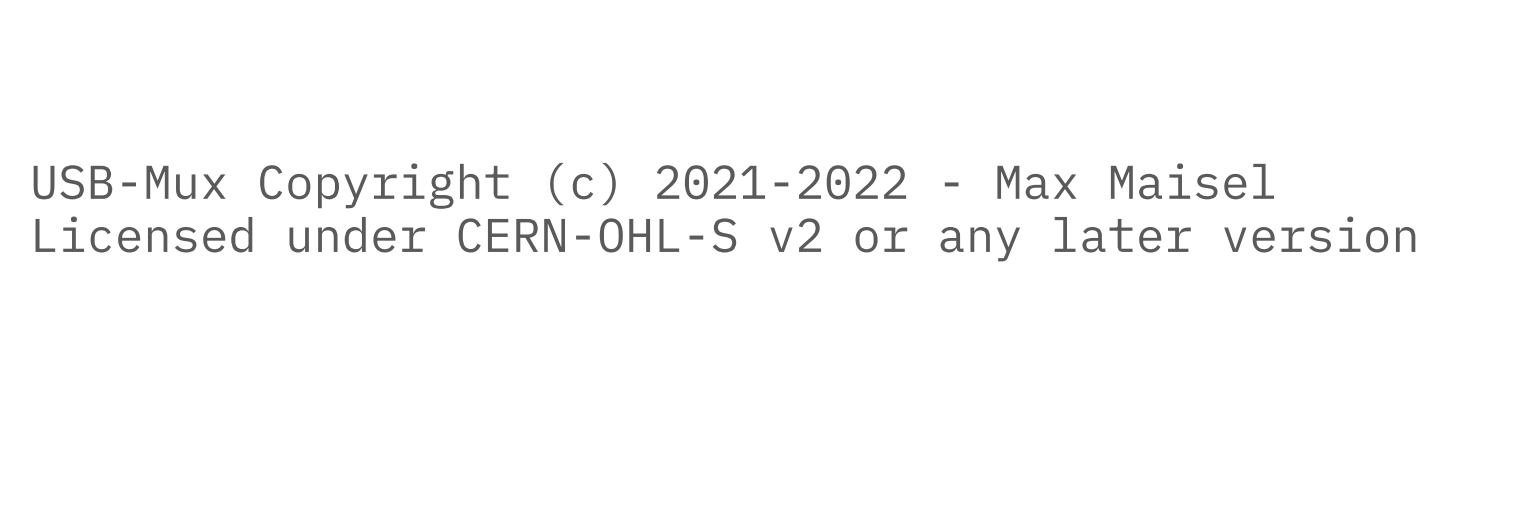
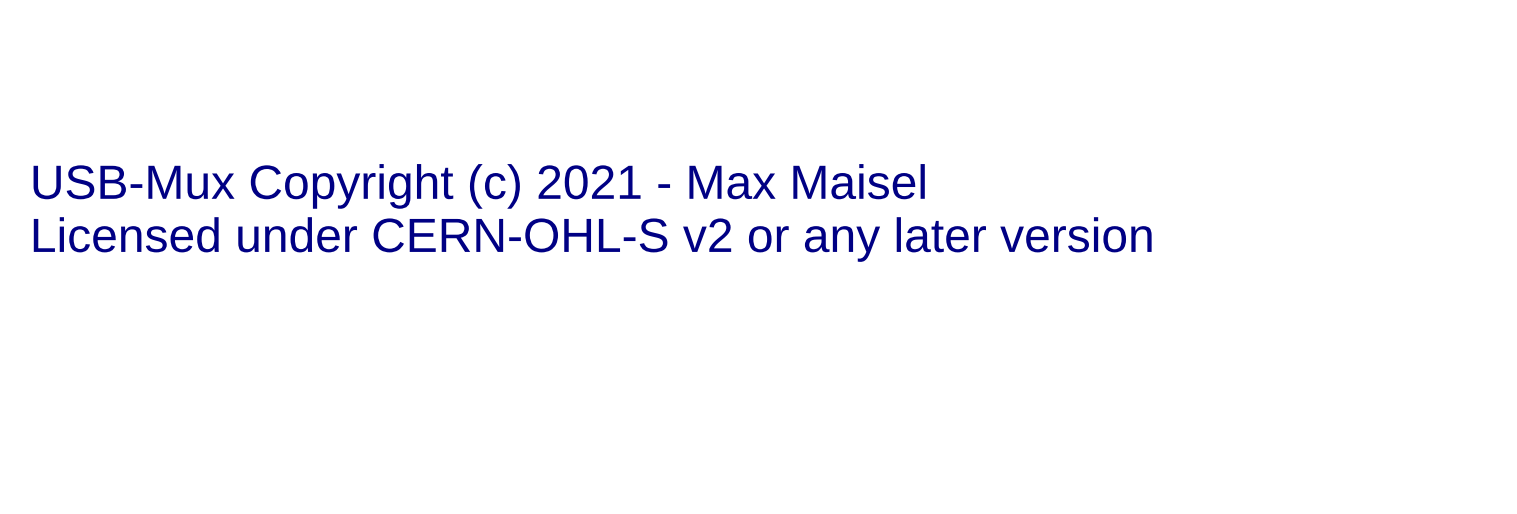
text: USB-Mux Copyright (c) 2021-2022 - Max Maisel (653, 185) -> USB-Mux Copyright (c) 2021 - Max Maisel (479, 186)

